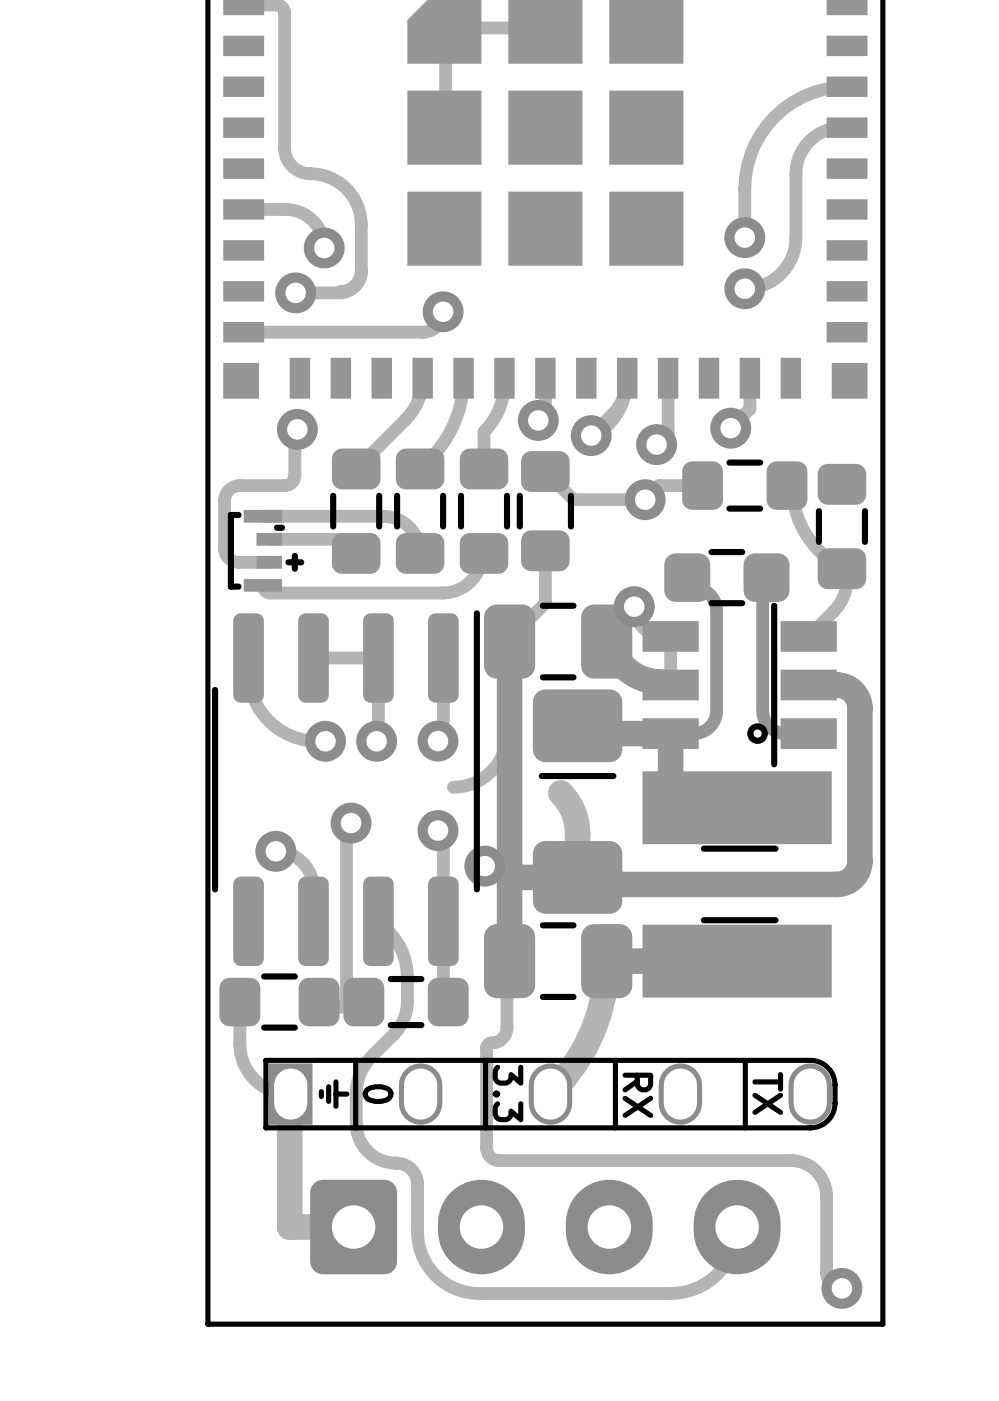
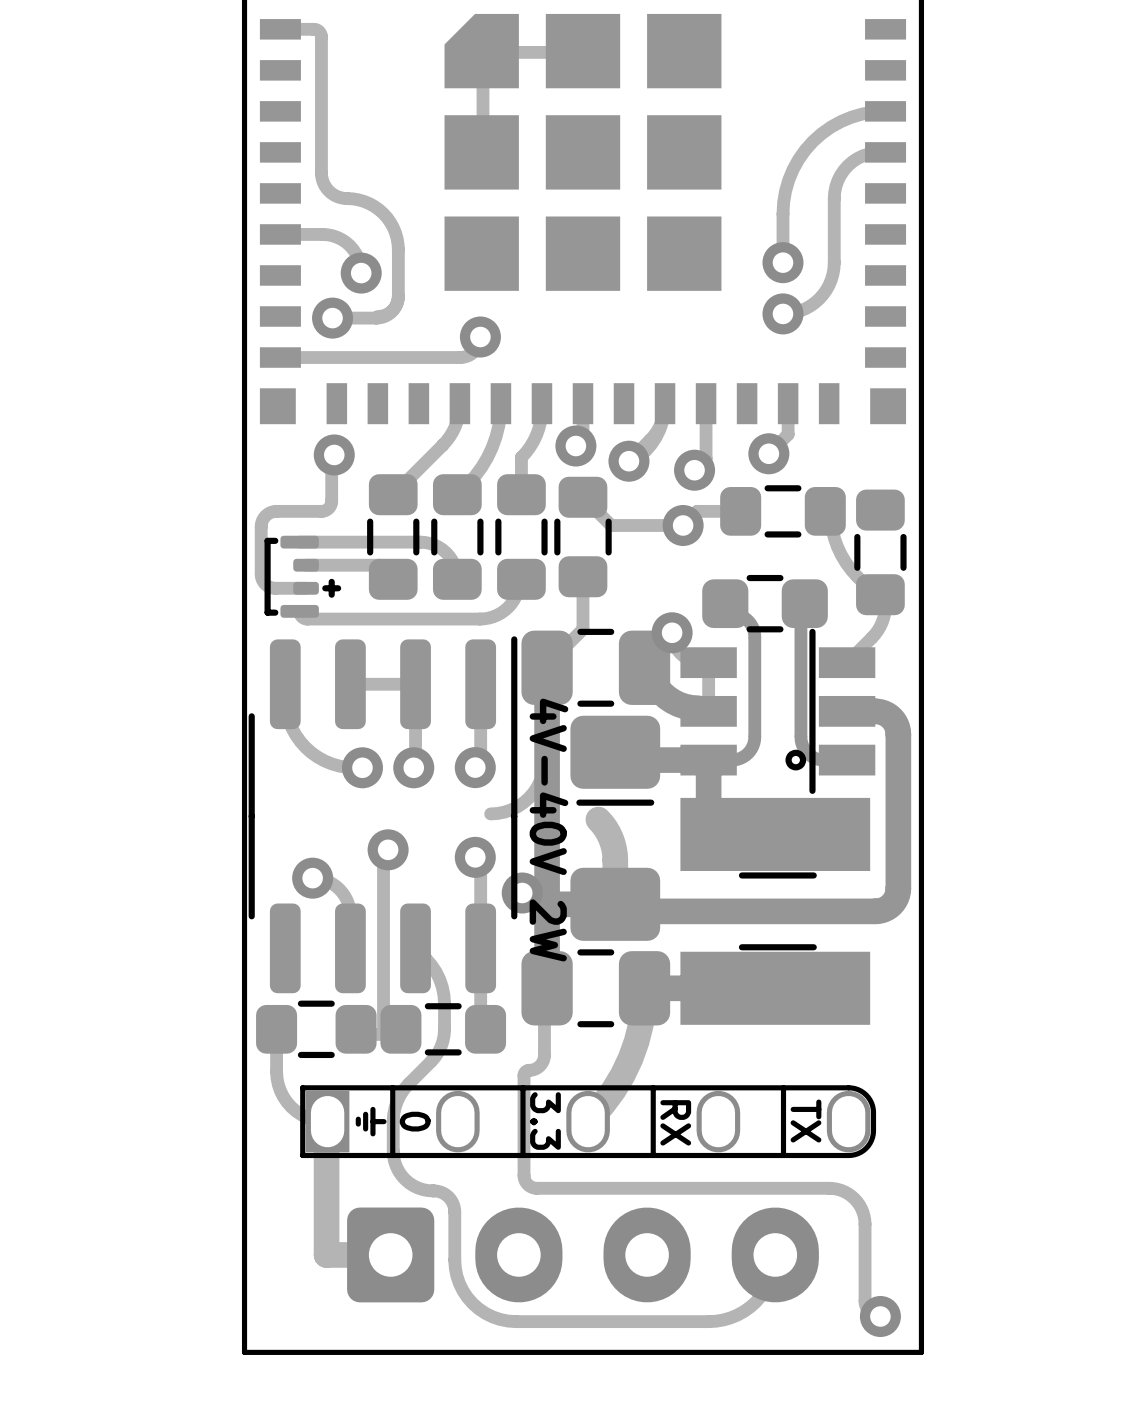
part footprint: [227, 509, 305, 592] -> [264, 535, 342, 618]
part text: none -> 4V-40V 2W (548, 830)

